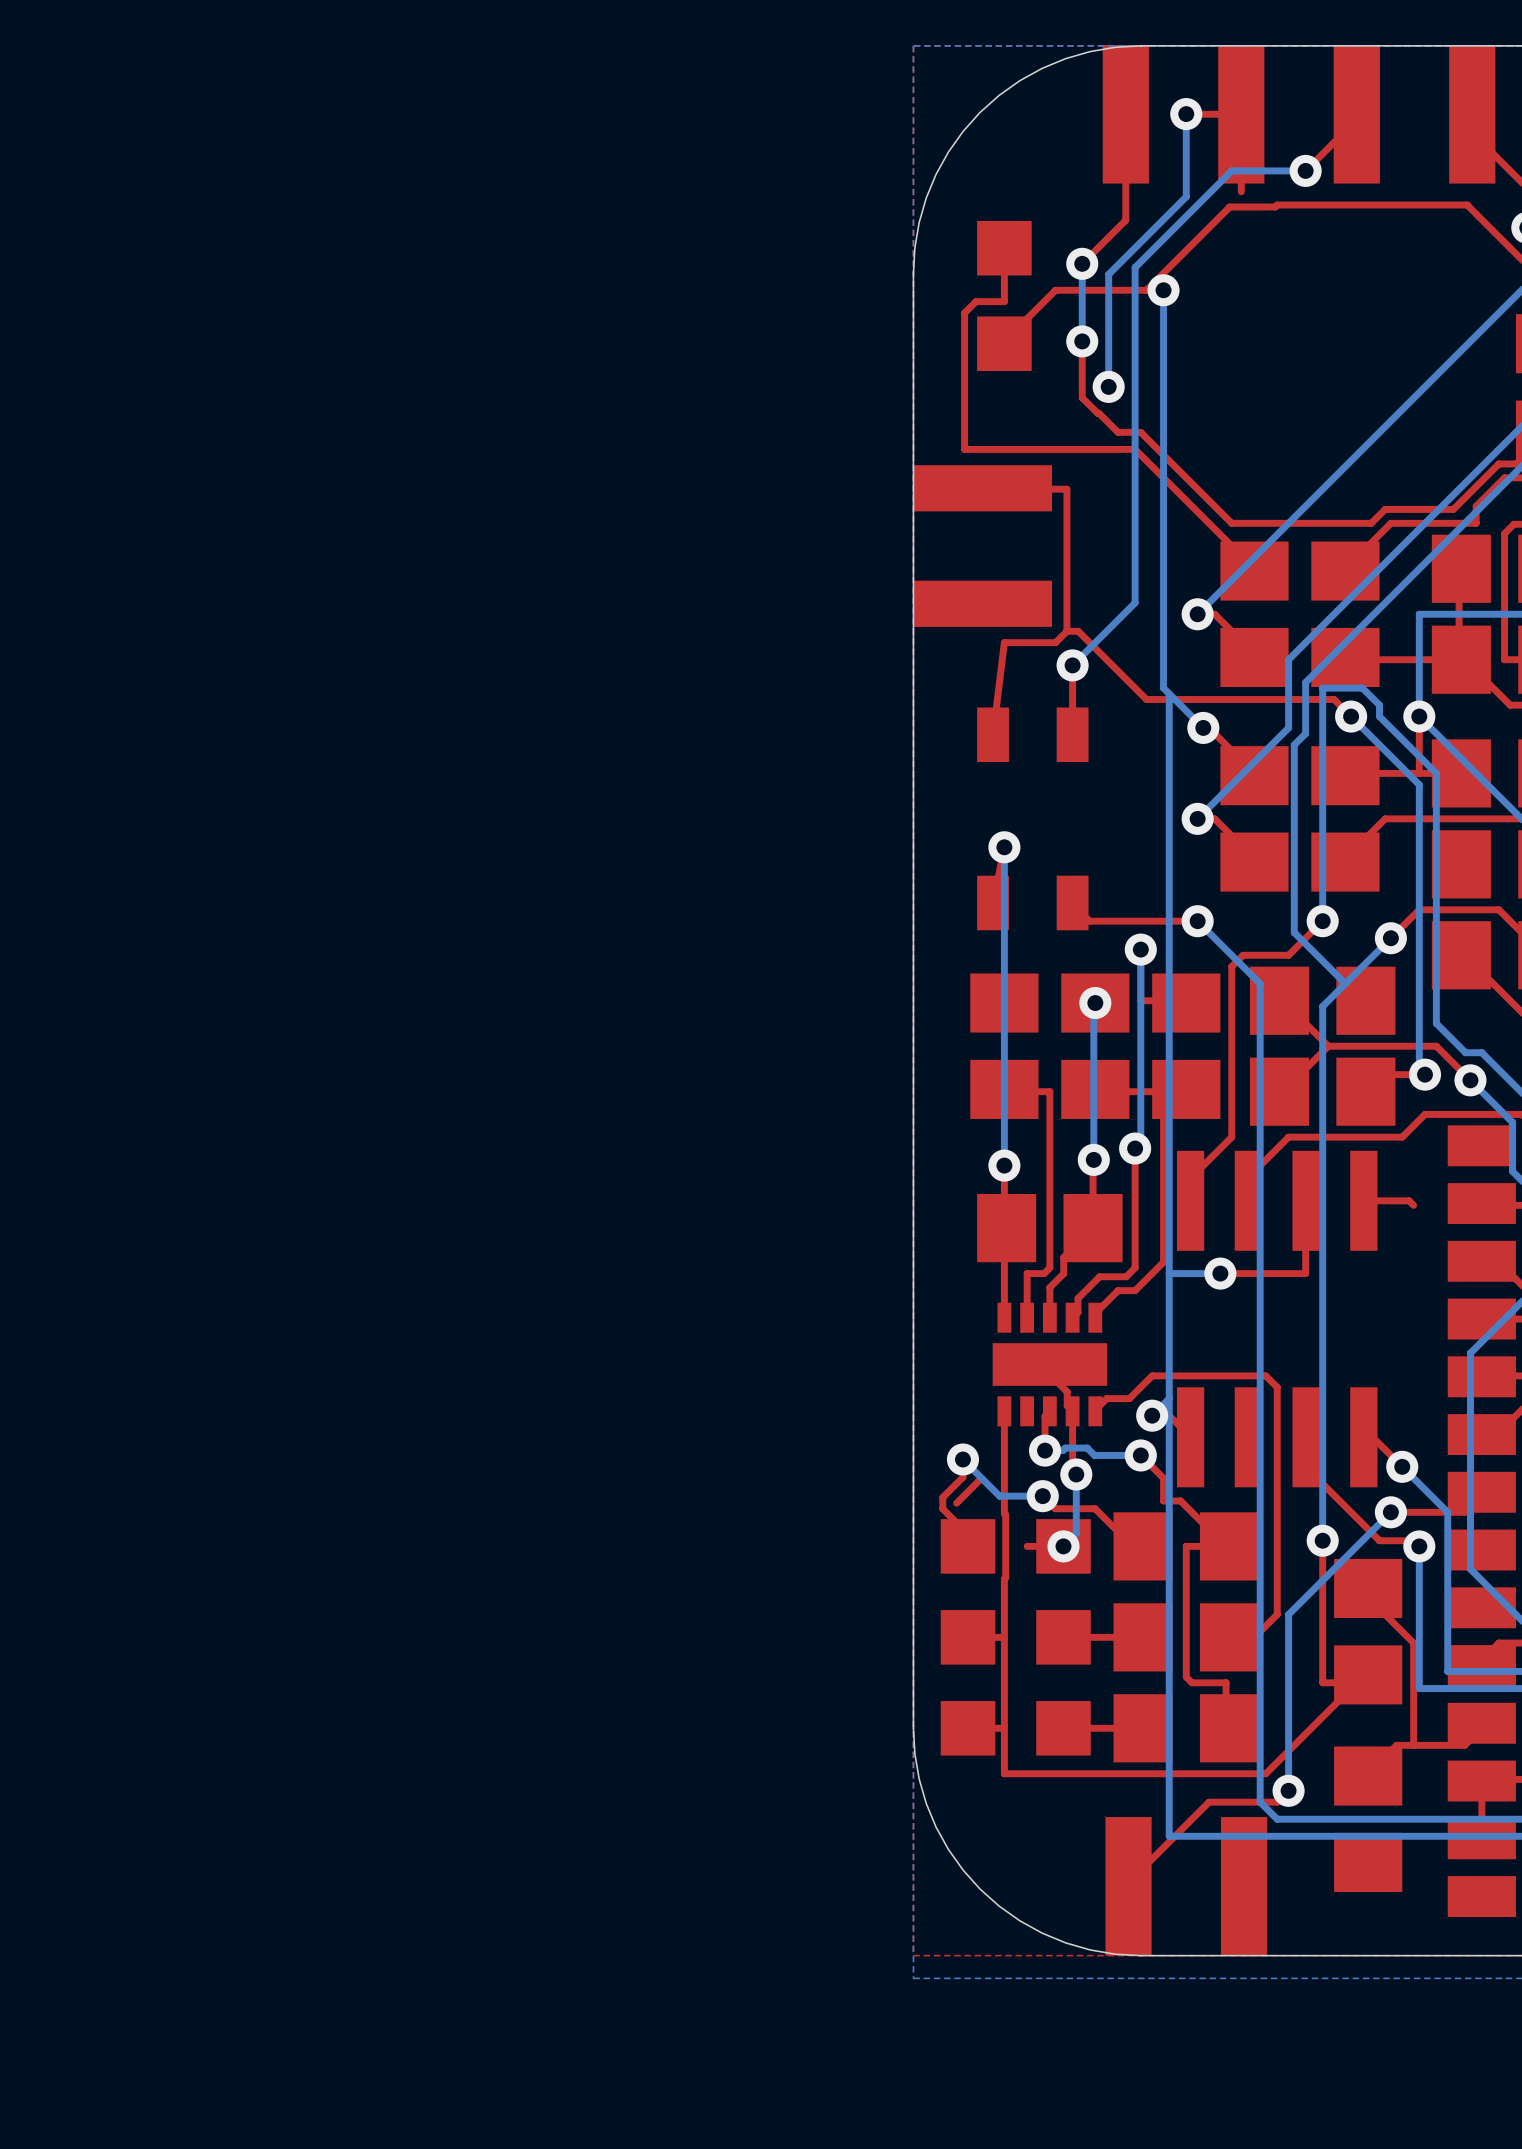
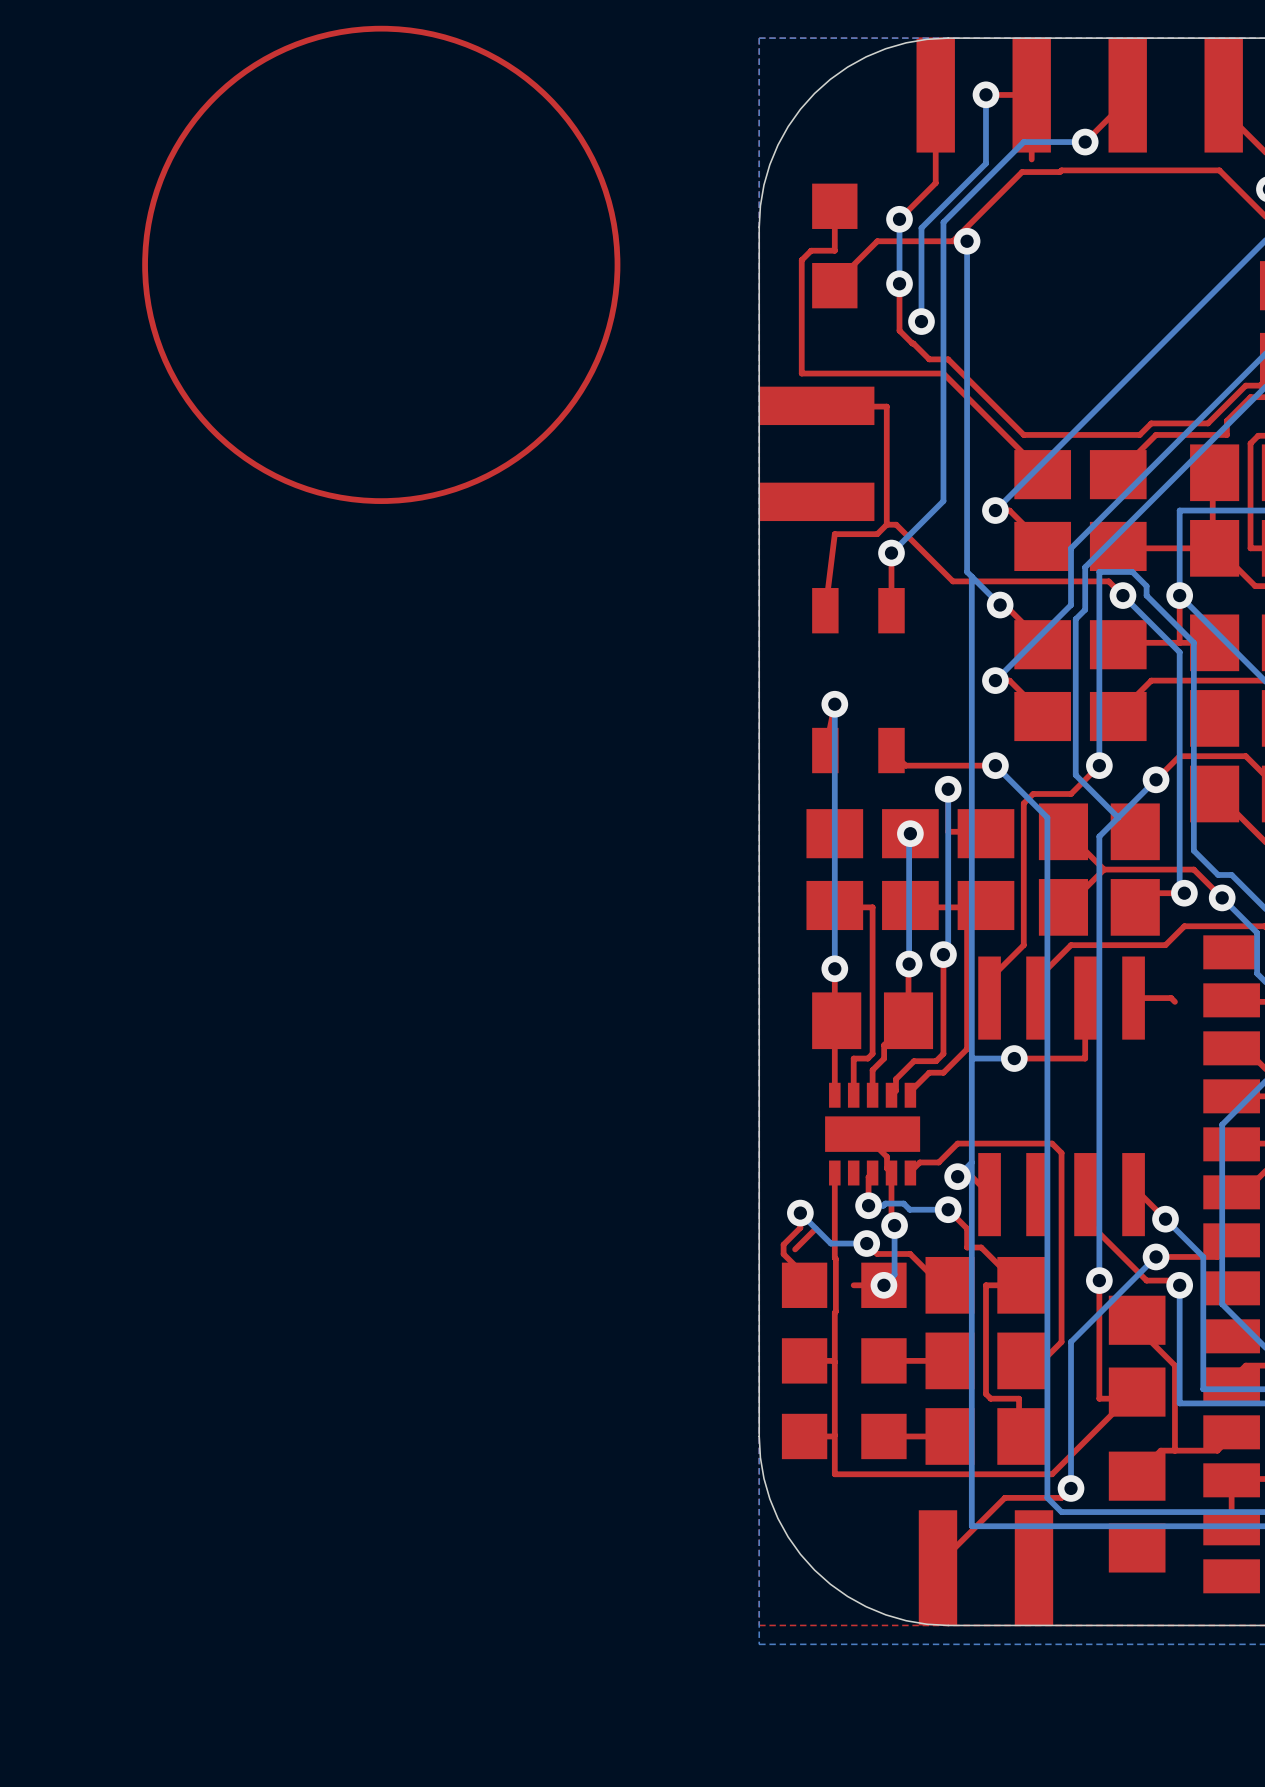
drawing: none -> [142, 25, 621, 504]

